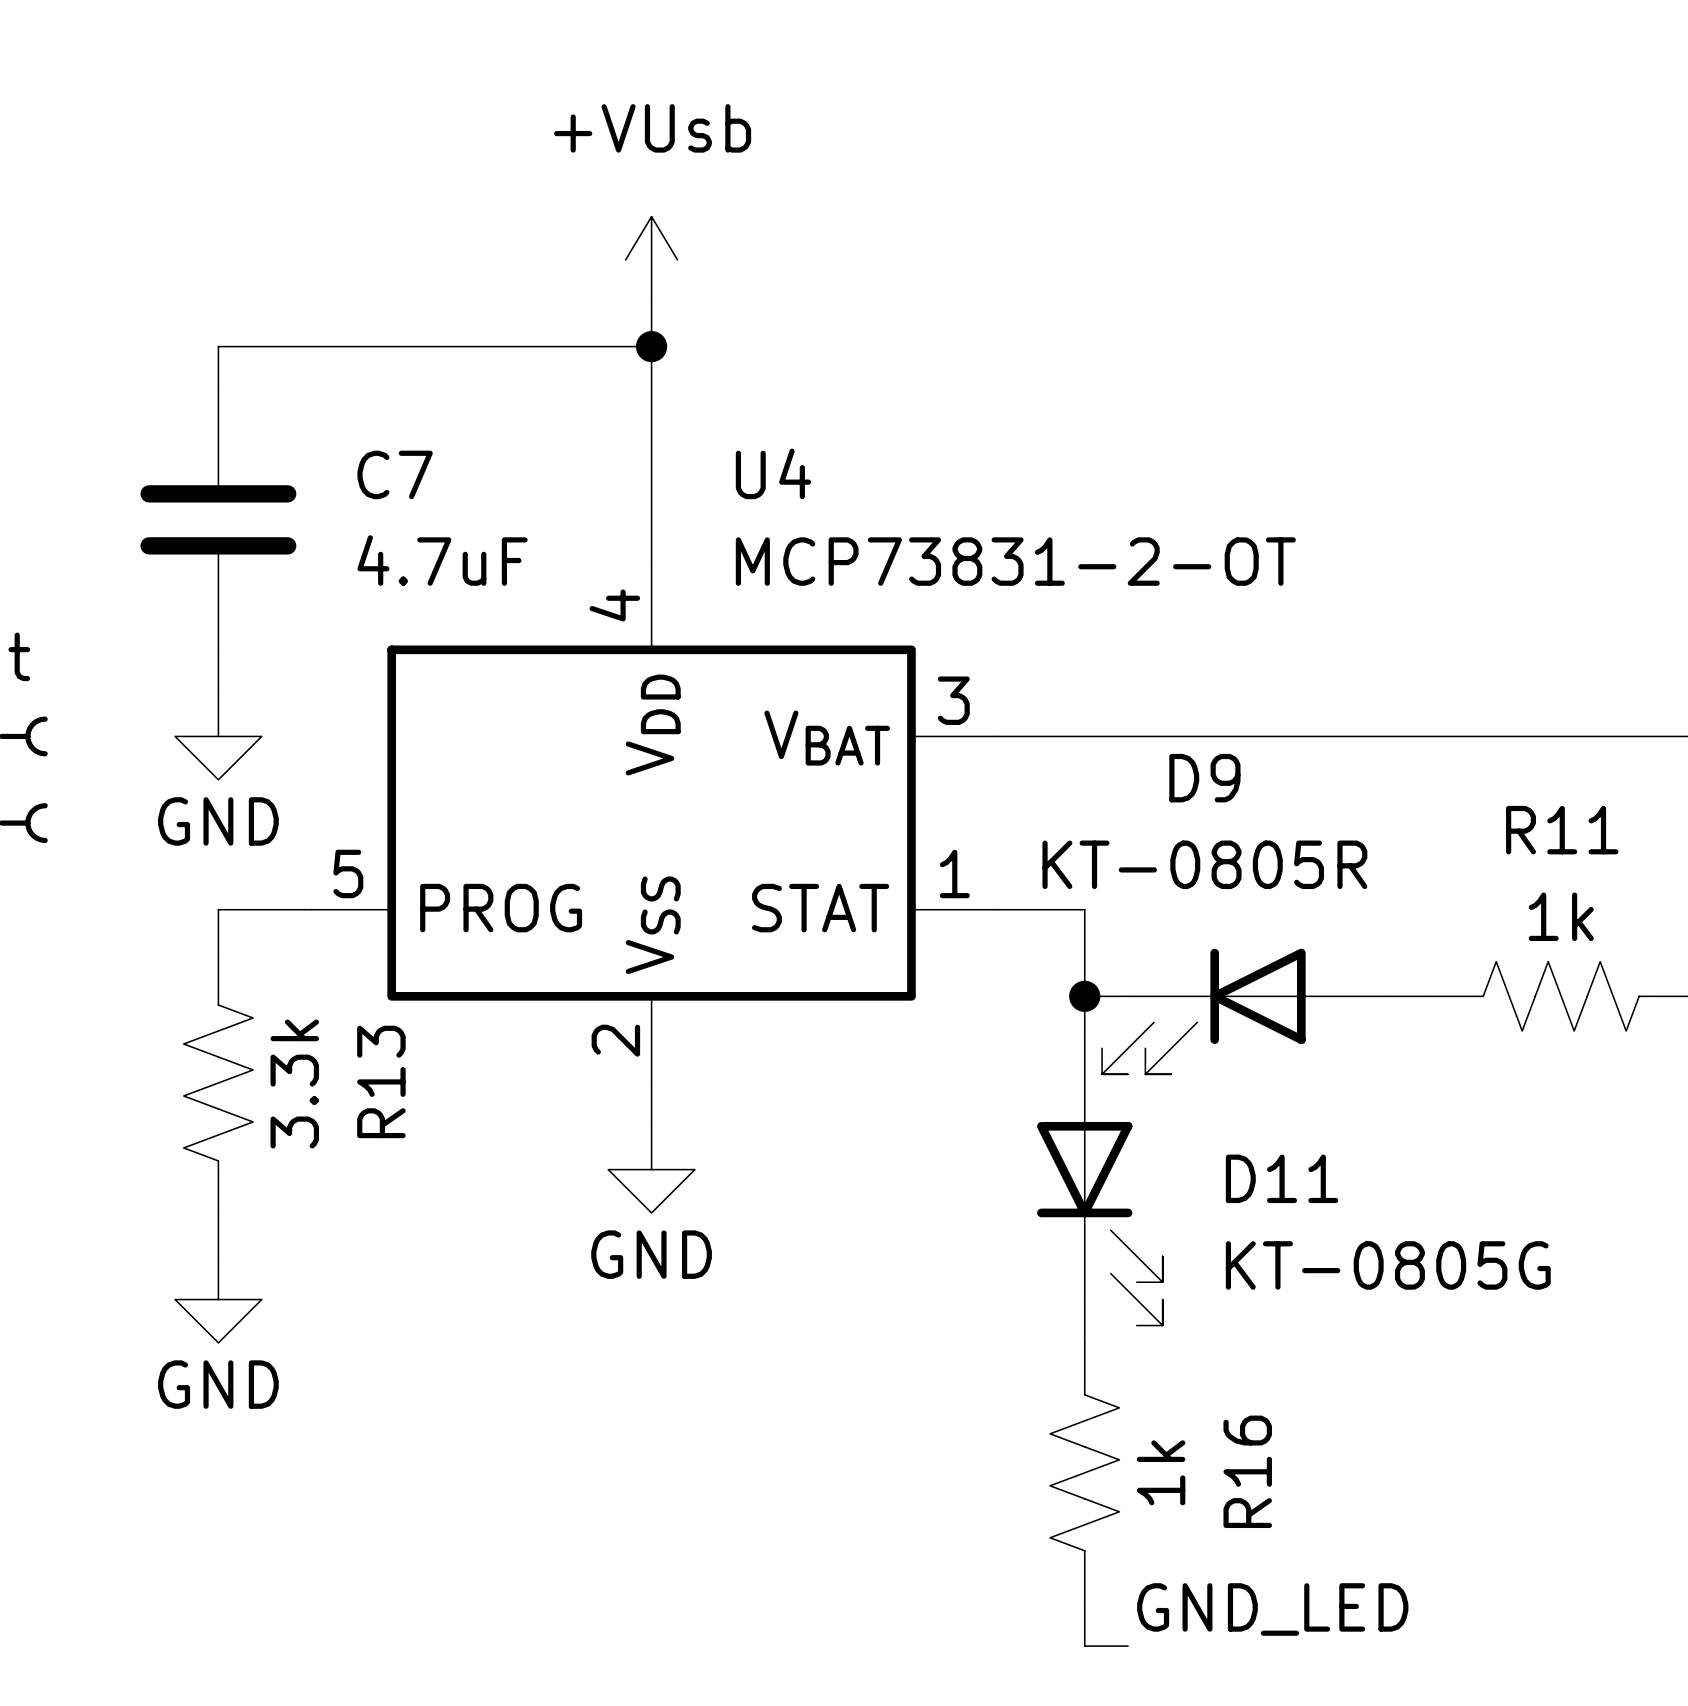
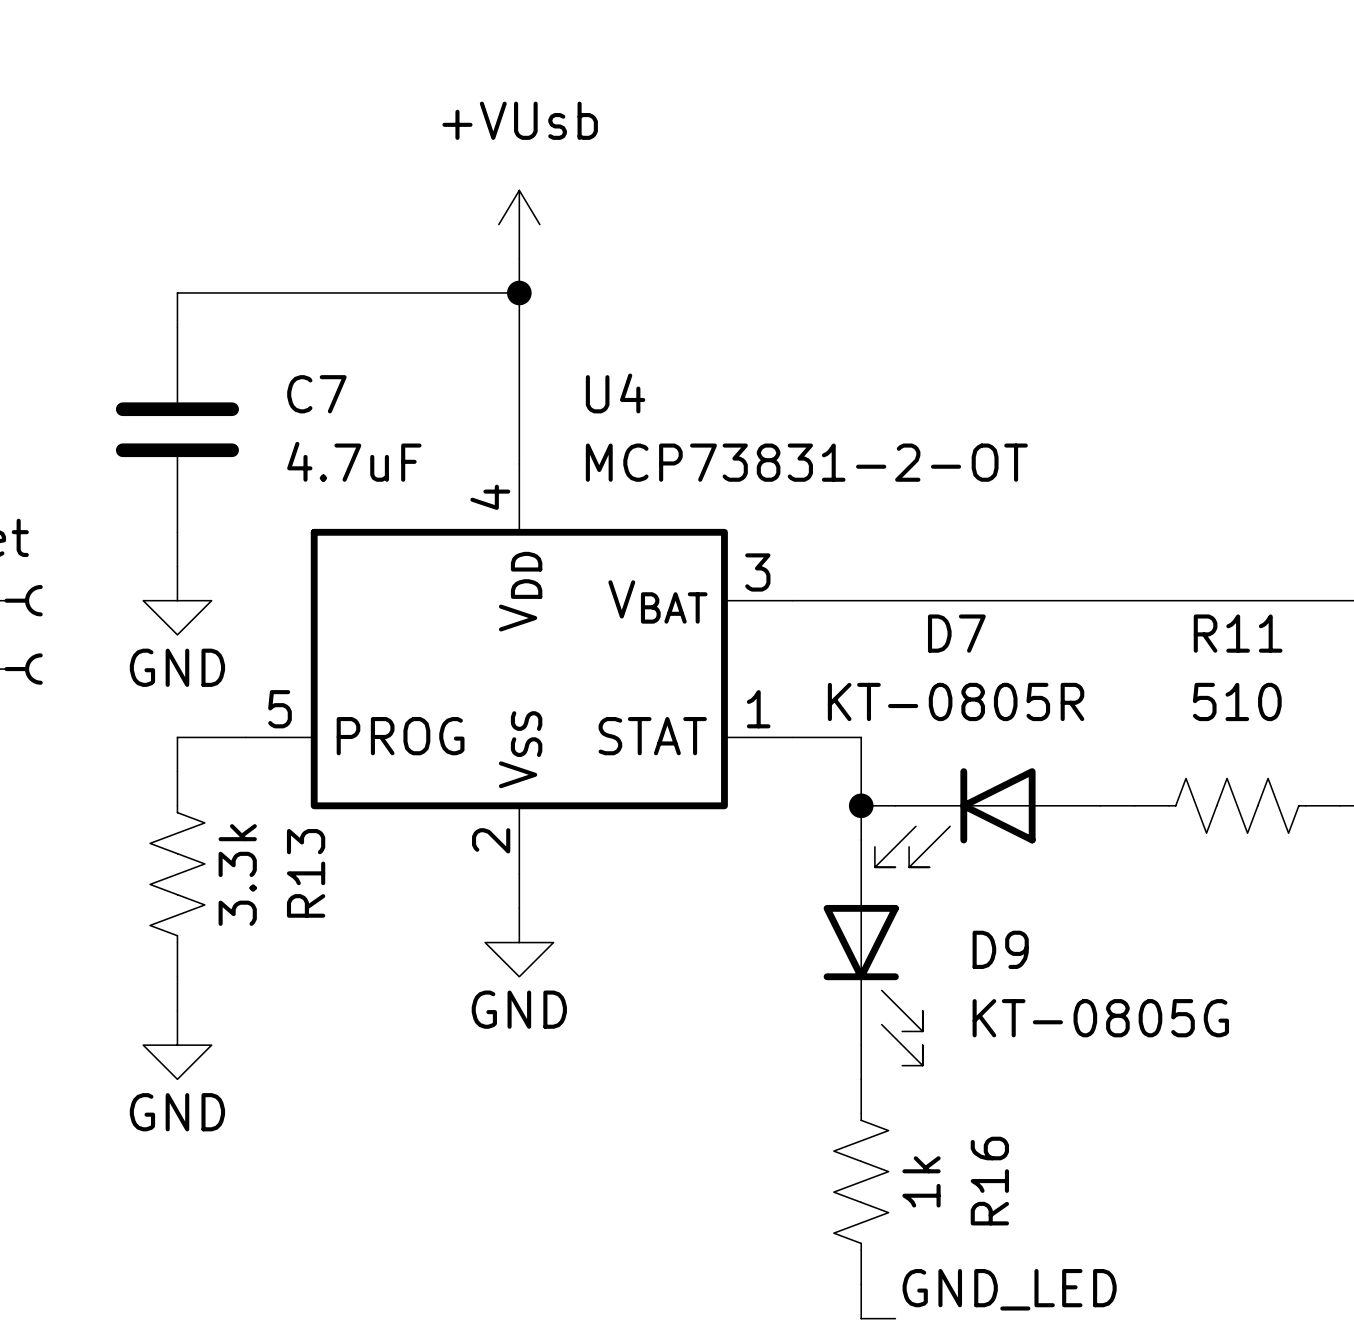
D9 name: D9 (1204, 778) -> D7 (956, 633)
R11 name position: R11 (1562, 830) -> R11 (1238, 633)
R11 value: 1k (1561, 916) -> 510 (1237, 701)
D11 name: D11 (1282, 1178) -> D9 (1000, 949)

